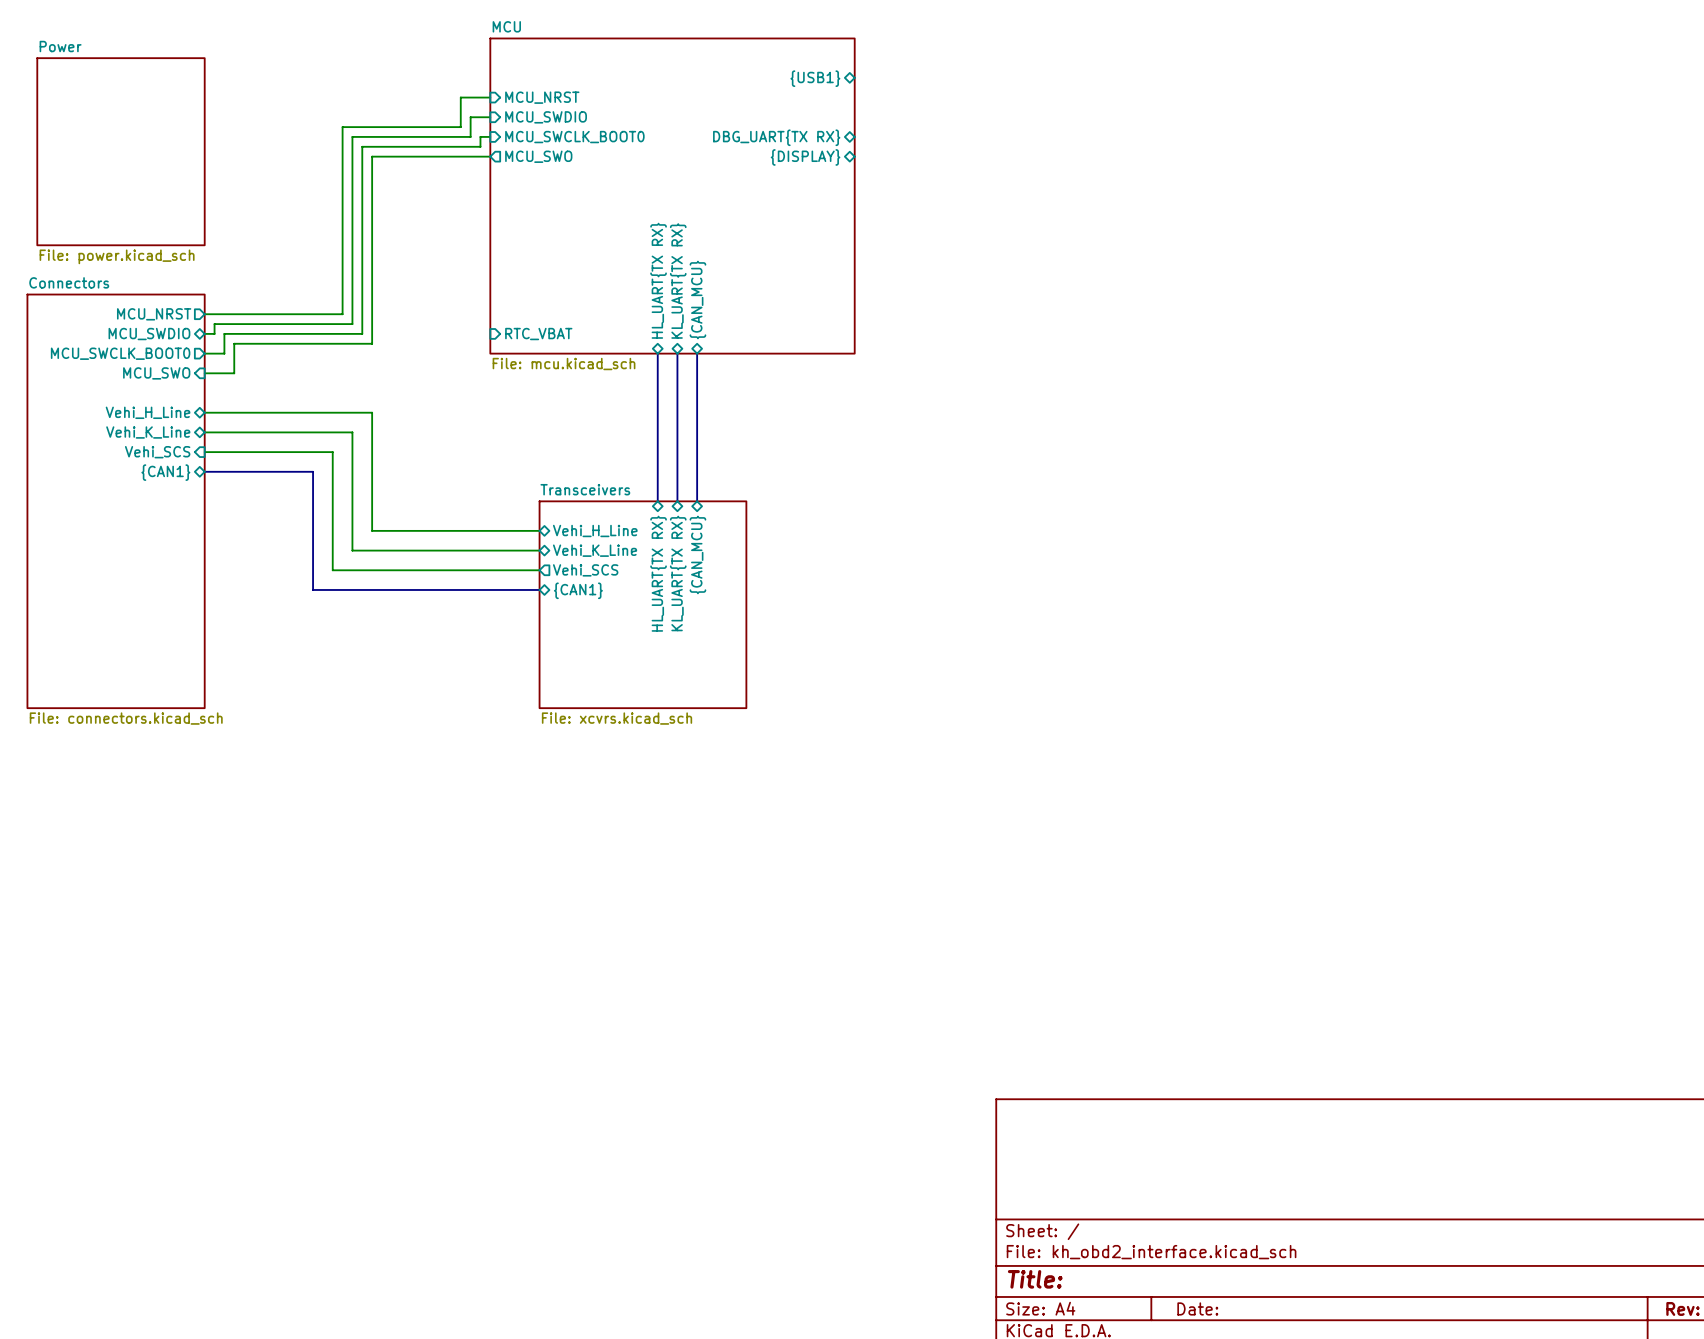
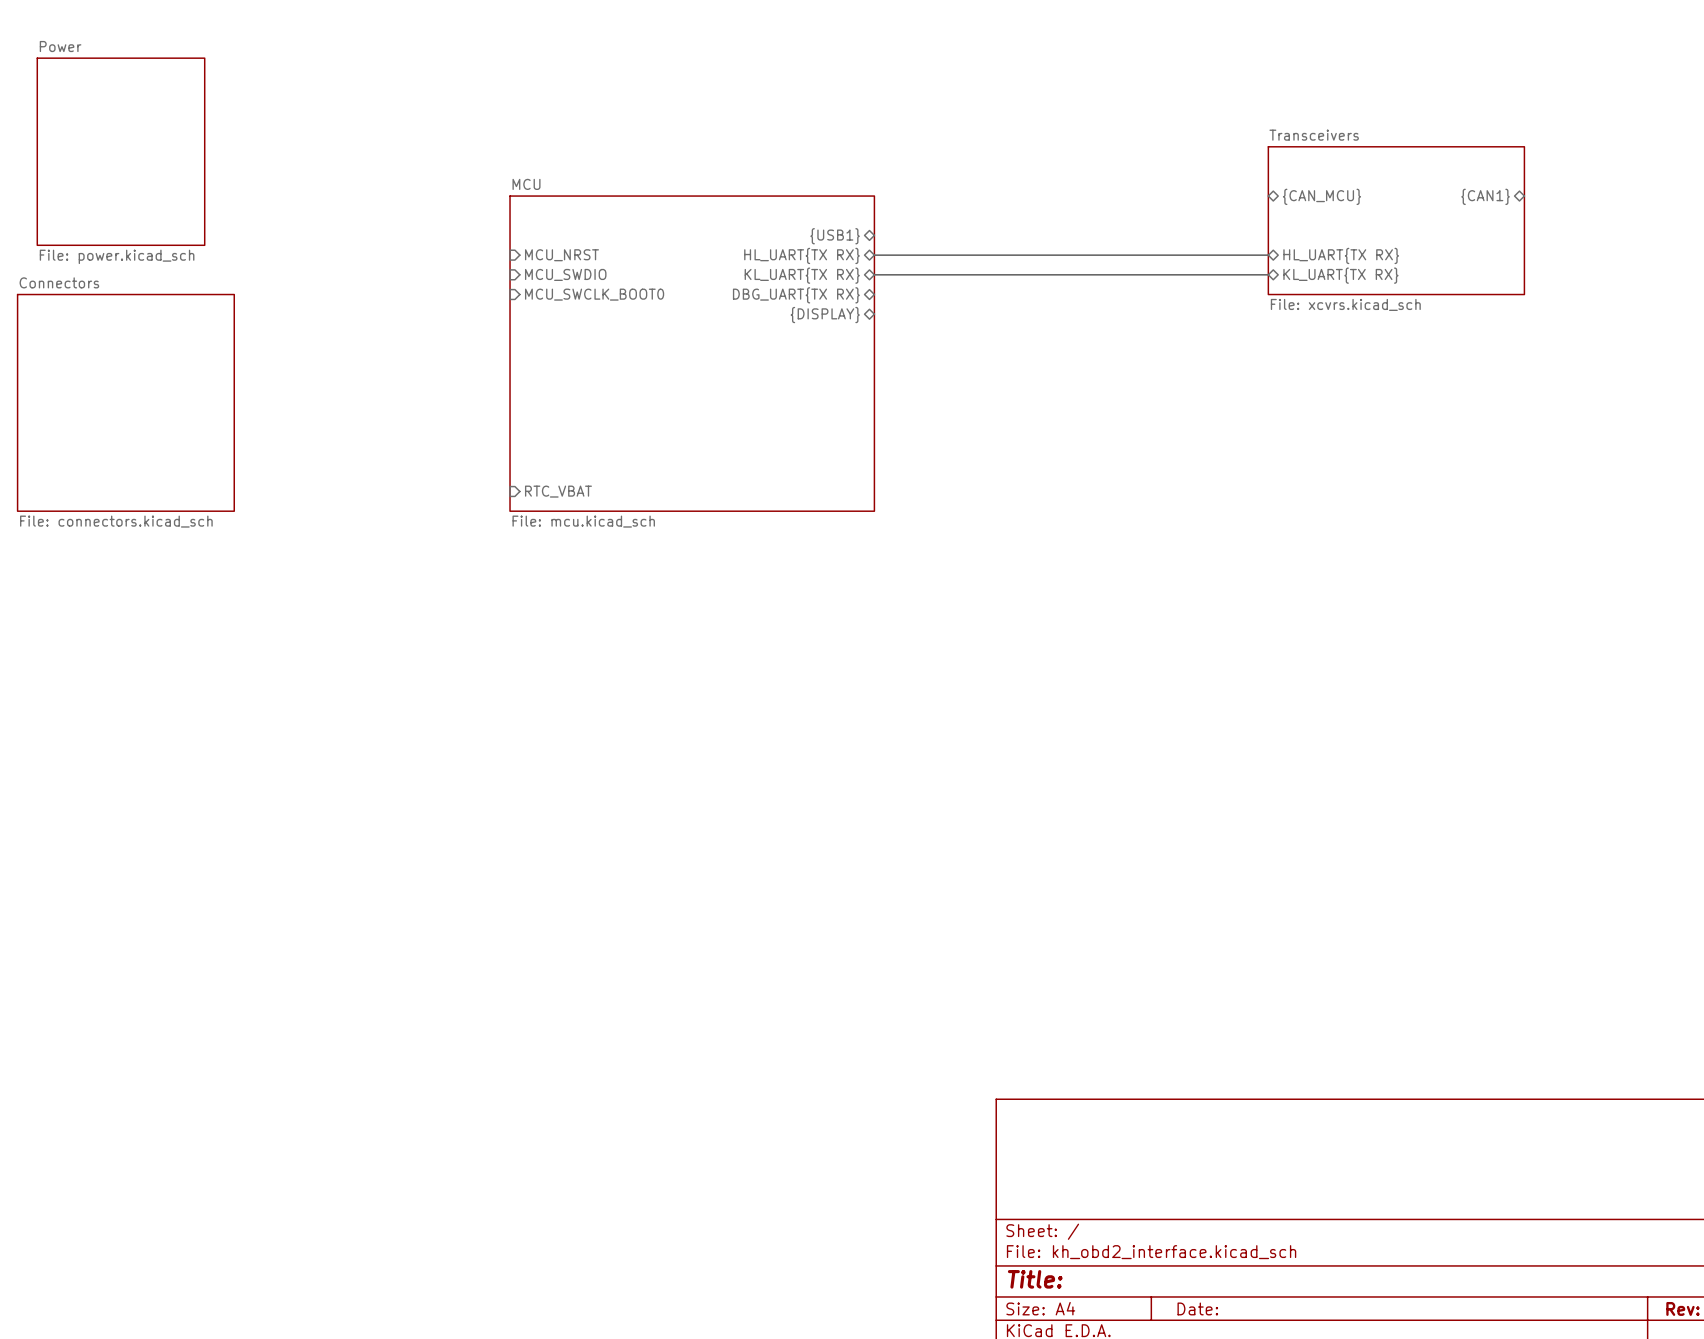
sheet pin position: {USB1} (815, 78) -> {USB1} (835, 236)
wire: (490, 97) (460, 97) (460, 127) (342, 127) (342, 314) (204, 314) -> none
sheet pin position: MCU_NRST (542, 97) -> MCU_NRST (561, 255)
wire: (490, 117) (470, 117) (470, 136) (352, 136) (352, 324) (214, 324) (214, 333) (204, 333) -> none
sheet pin position: MCU_SWDIO (546, 117) -> MCU_SWDIO (565, 274)
wire: (490, 136) (480, 136) (480, 146) (362, 146) (362, 333) (224, 333) (224, 353) (204, 353) -> none
sheet pin position: MCU_SWCLK_BOOT0 (574, 137) -> MCU_SWCLK_BOOT0 (594, 294)
sheet pin position: DBG_UART{TX RX} (776, 137) -> DBG_UART{TX RX} (796, 295)
wire: (490, 156) (372, 156) (372, 343) (234, 343) (234, 373) (204, 373) -> none
sheet pin: MCU_SWO (538, 156) -> none
sheet pin position: {DISPLAY} (805, 157) -> {DISPLAY} (825, 315)
sheet MCU position: (672, 196) -> (692, 353)
sheet pin: none -> {CAN_MCU} (1321, 196)
sheet pin: none -> {CAN1} (1485, 196)
sheet Transceivers: none -> File: xcvrs.kicad_sch (1396, 220)
sheet pin: none -> HL_UART{TX RX} (802, 255)
bus: none -> (874, 255) (1268, 255)
sheet pin: none -> HL_UART{TX RX} (1341, 255)
bus: none -> (874, 274) (1268, 274)
sheet pin: none -> KL_UART{TX RX} (802, 275)
sheet pin: none -> KL_UART{TX RX} (1340, 275)
sheet pin: HL_UART{TX RX} (658, 280) -> none
sheet pin: KL_UART{TX RX} (678, 281) -> none
sheet pin: {CAN_MCU} (697, 300) -> none
sheet pin: MCU_NRST (154, 314) -> none
sheet pin: MCU_SWDIO (149, 334) -> none
sheet pin position: RTC_VBAT (538, 334) -> RTC_VBAT (558, 491)
sheet pin: MCU_SWCLK_BOOT0 (120, 353) -> none
bus: (657, 353) (657, 501) -> none
bus: (677, 353) (677, 501) -> none
bus: (697, 353) (697, 501) -> none
sheet pin: MCU_SWO (156, 373) -> none
sheet Connectors: none -> File: connectors.kicad_sch (125, 402)
sheet pin: Vehi_H_Line (148, 412) -> none
wire: (204, 412) (372, 412) (372, 530) (539, 530) -> none
sheet pin: Vehi_K_Line (148, 432) -> none
wire: (204, 432) (352, 432) (352, 550) (539, 550) -> none
sheet pin: Vehi_SCS (157, 452) -> none
wire: (204, 452) (332, 452) (332, 570) (539, 570) -> none
bus: (204, 471) (313, 471) (313, 589) (539, 589) -> none
sheet pin: {CAN1} (165, 472) -> none
sheet Connectors: File: connectors.kicad_sch (116, 501) -> none
sheet pin: Vehi_H_Line (595, 530) -> none
sheet pin: Vehi_K_Line (595, 550) -> none
sheet pin: {CAN_MCU} (697, 554) -> none
sheet pin: Vehi_SCS (585, 570) -> none
sheet pin: HL_UART{TX RX} (658, 573) -> none
sheet pin: KL_UART{TX RX} (678, 573) -> none
sheet pin: {CAN1} (578, 590) -> none
sheet Transceivers: File: xcvrs.kicad_sch (642, 604) -> none

